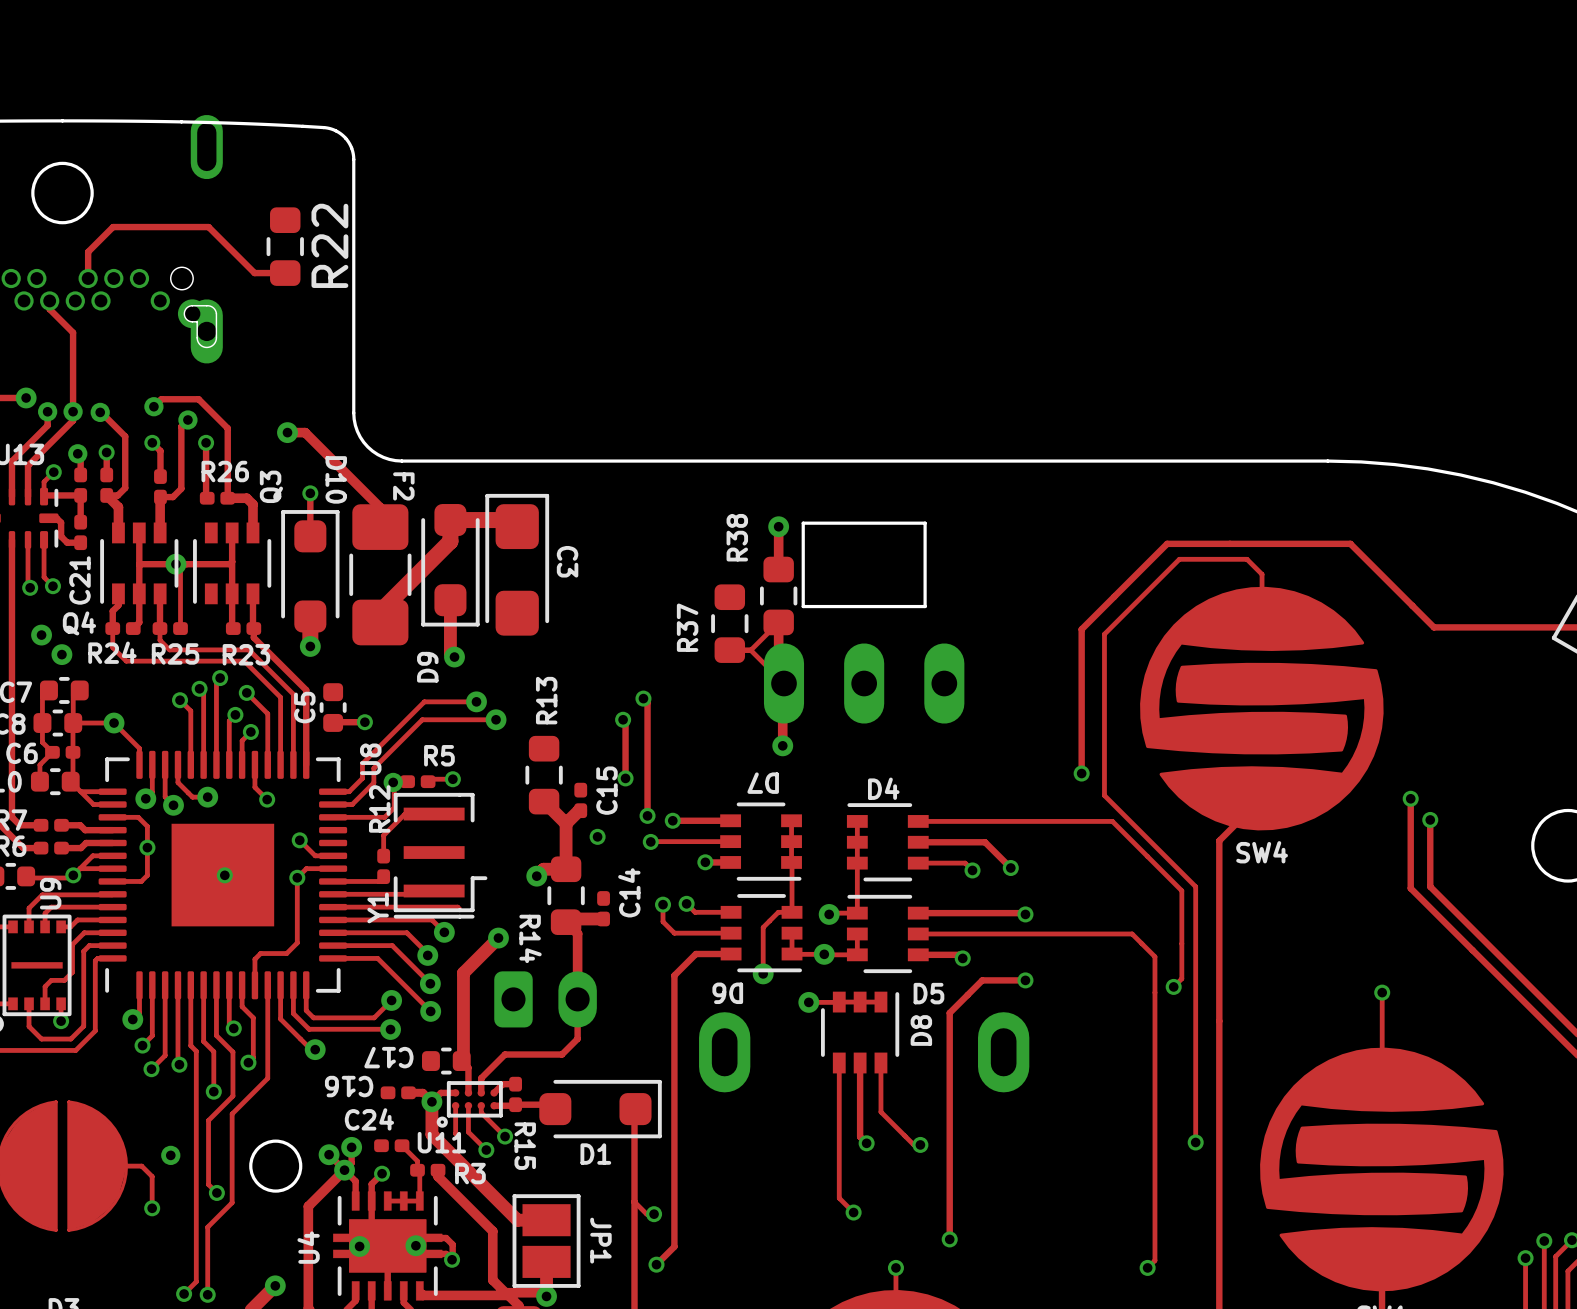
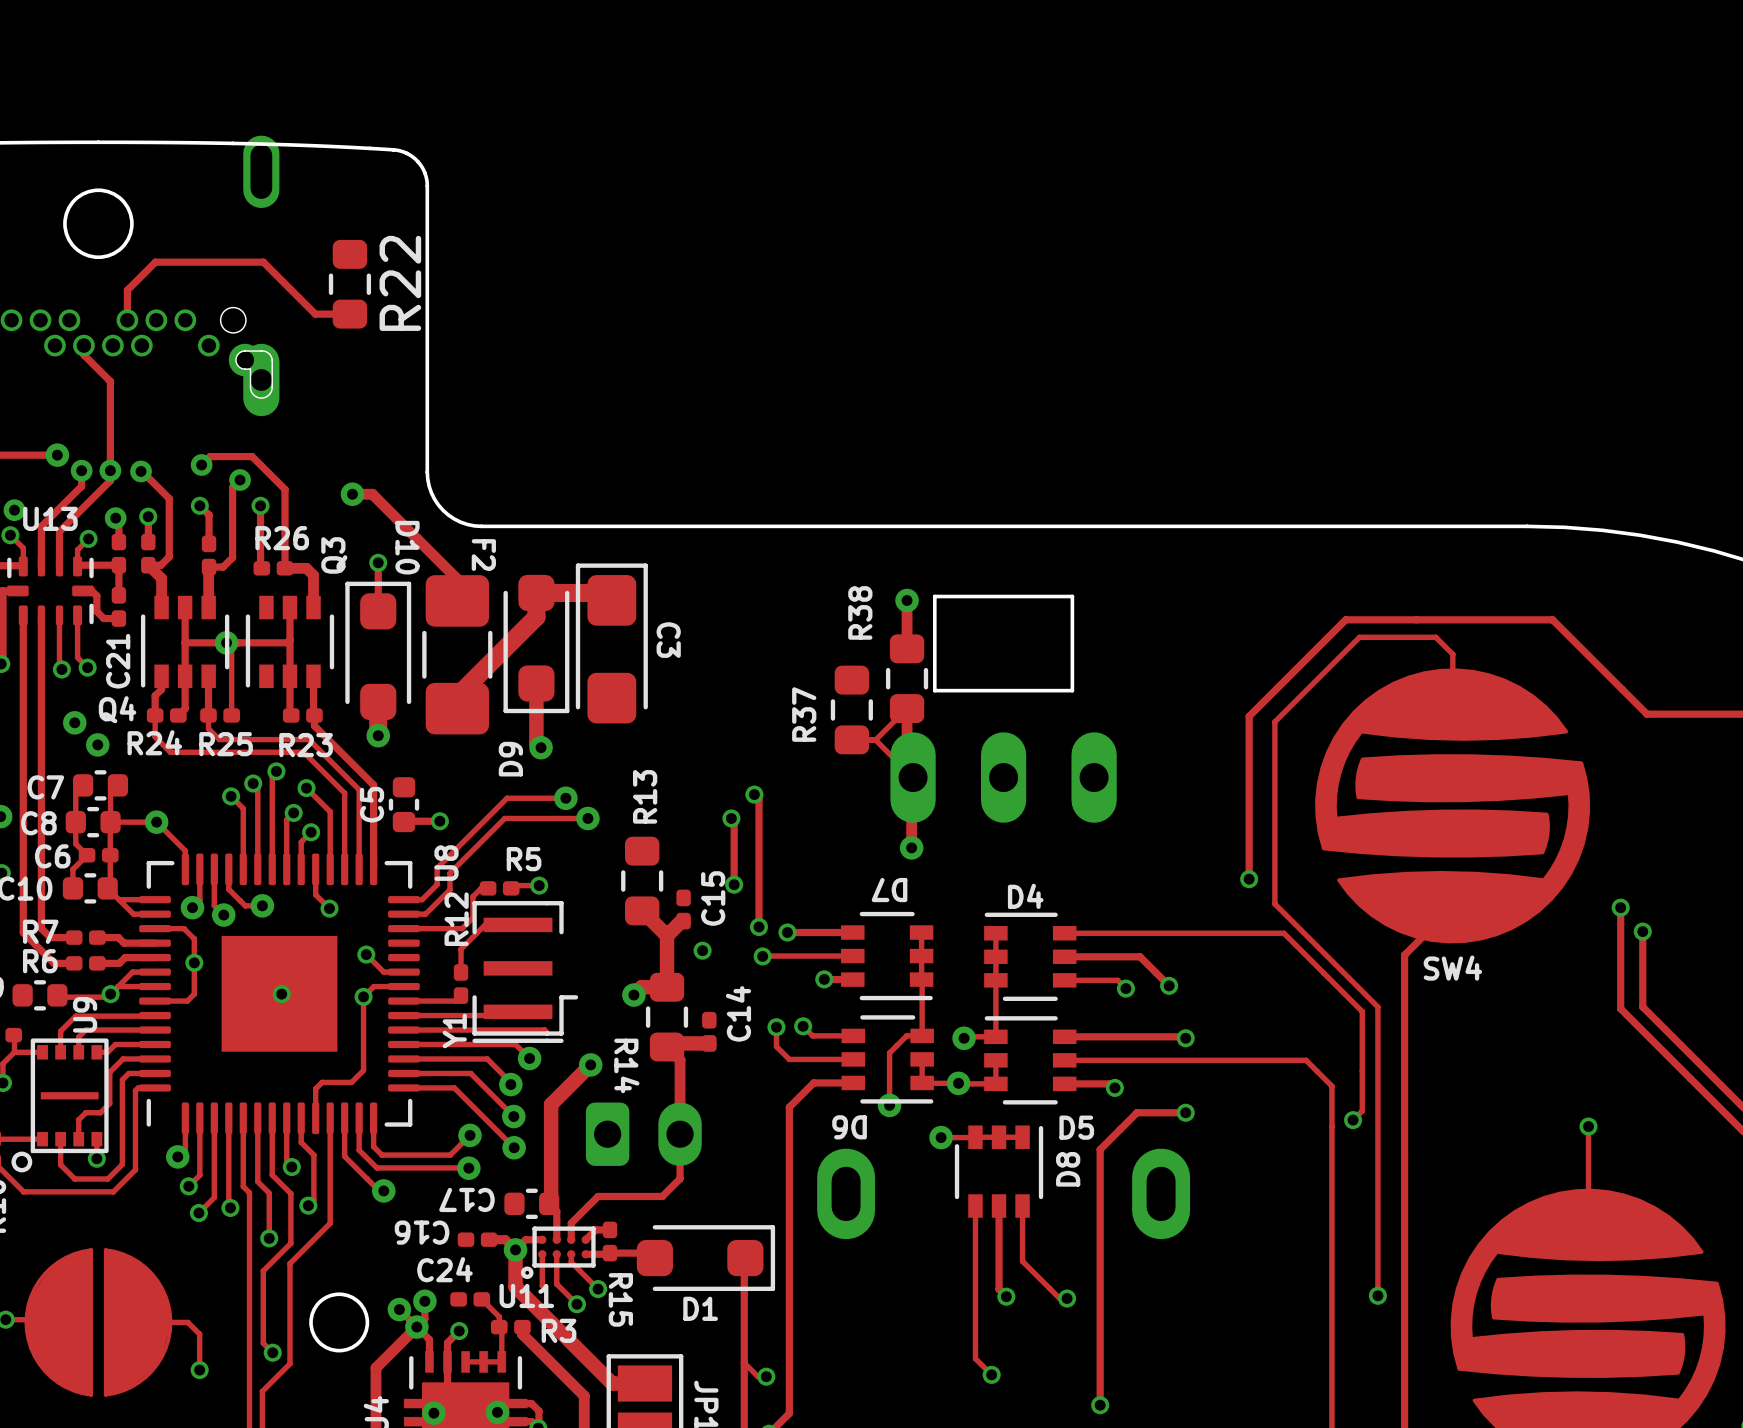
via: (393, 782) -> none
via: (170, 1155) -> none

